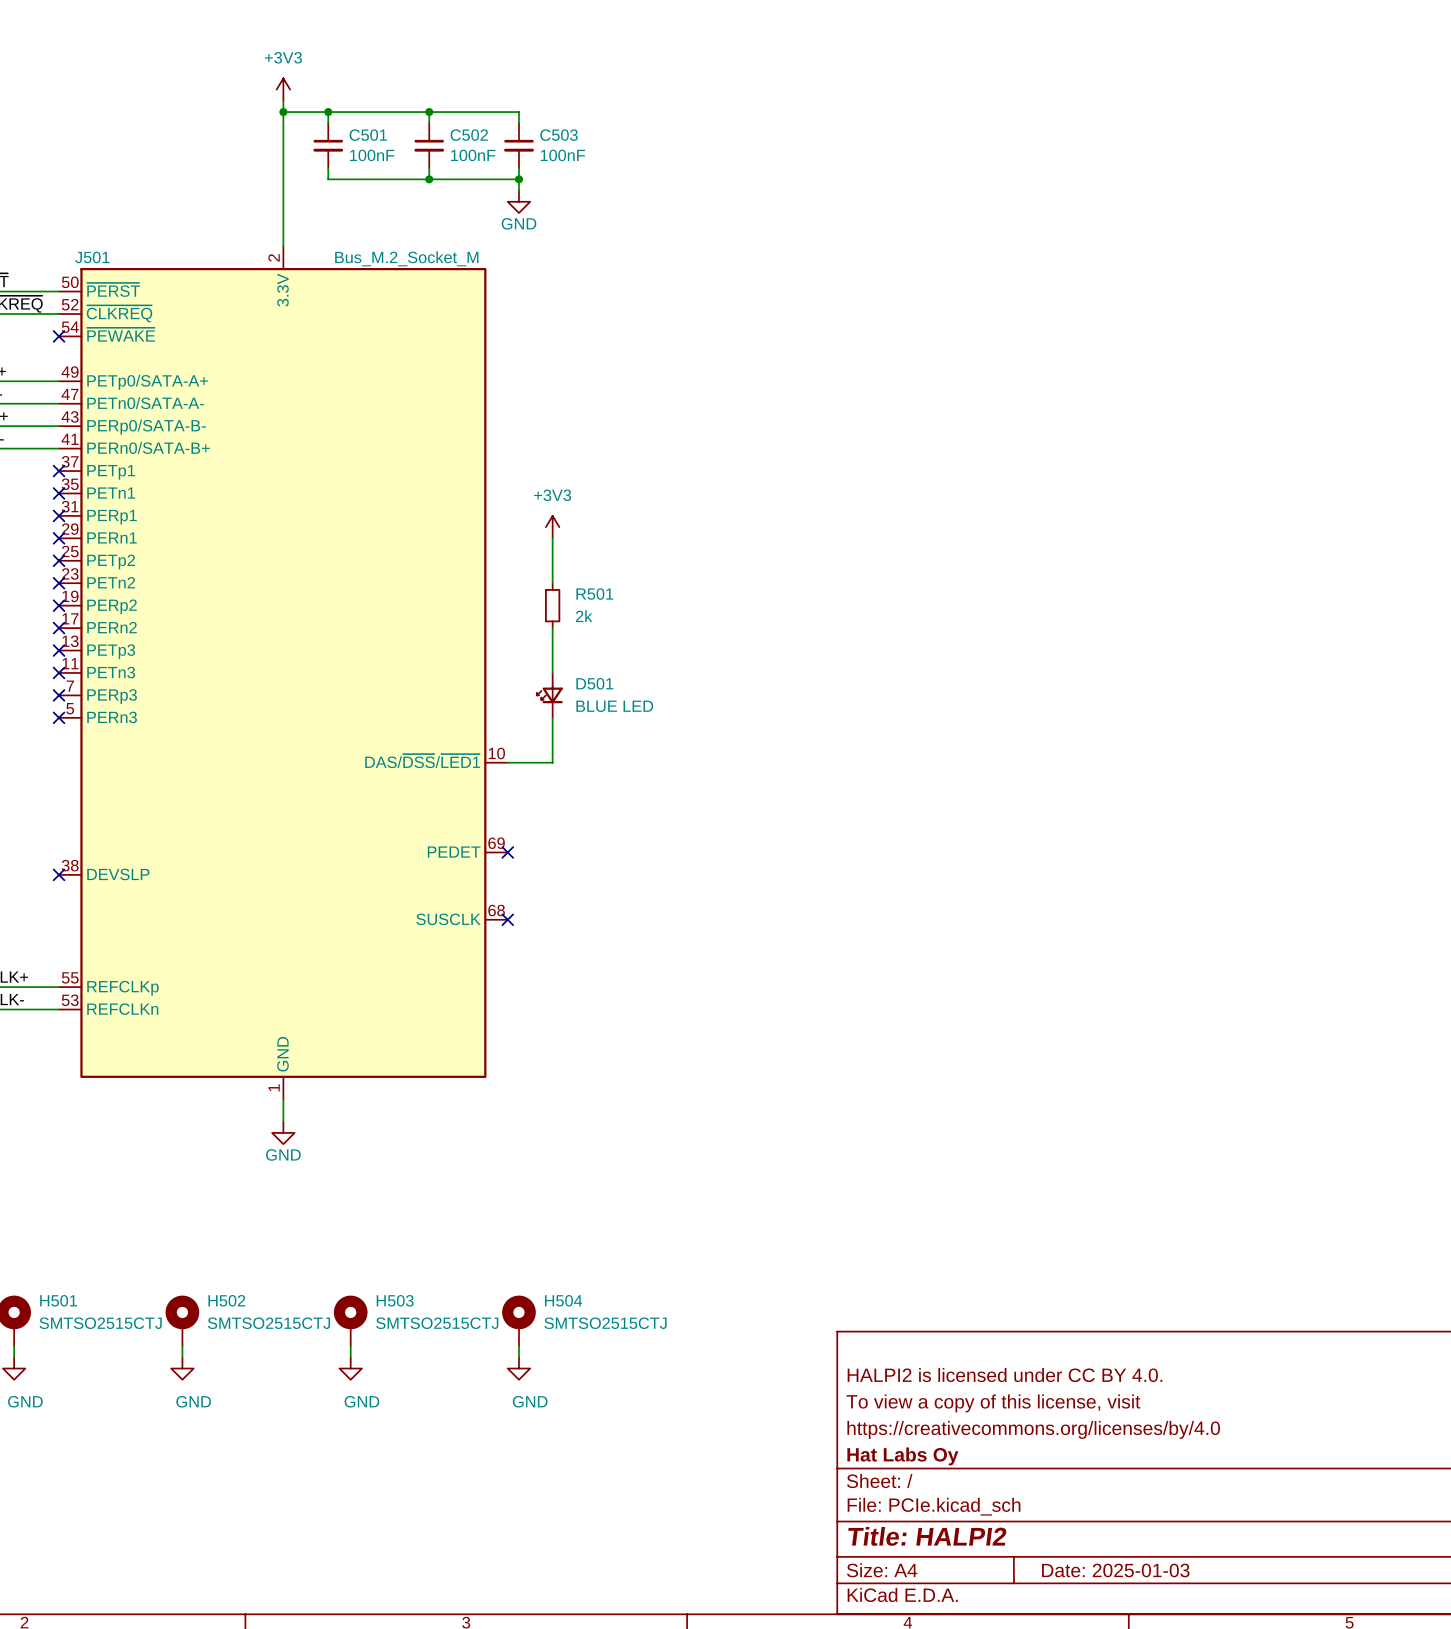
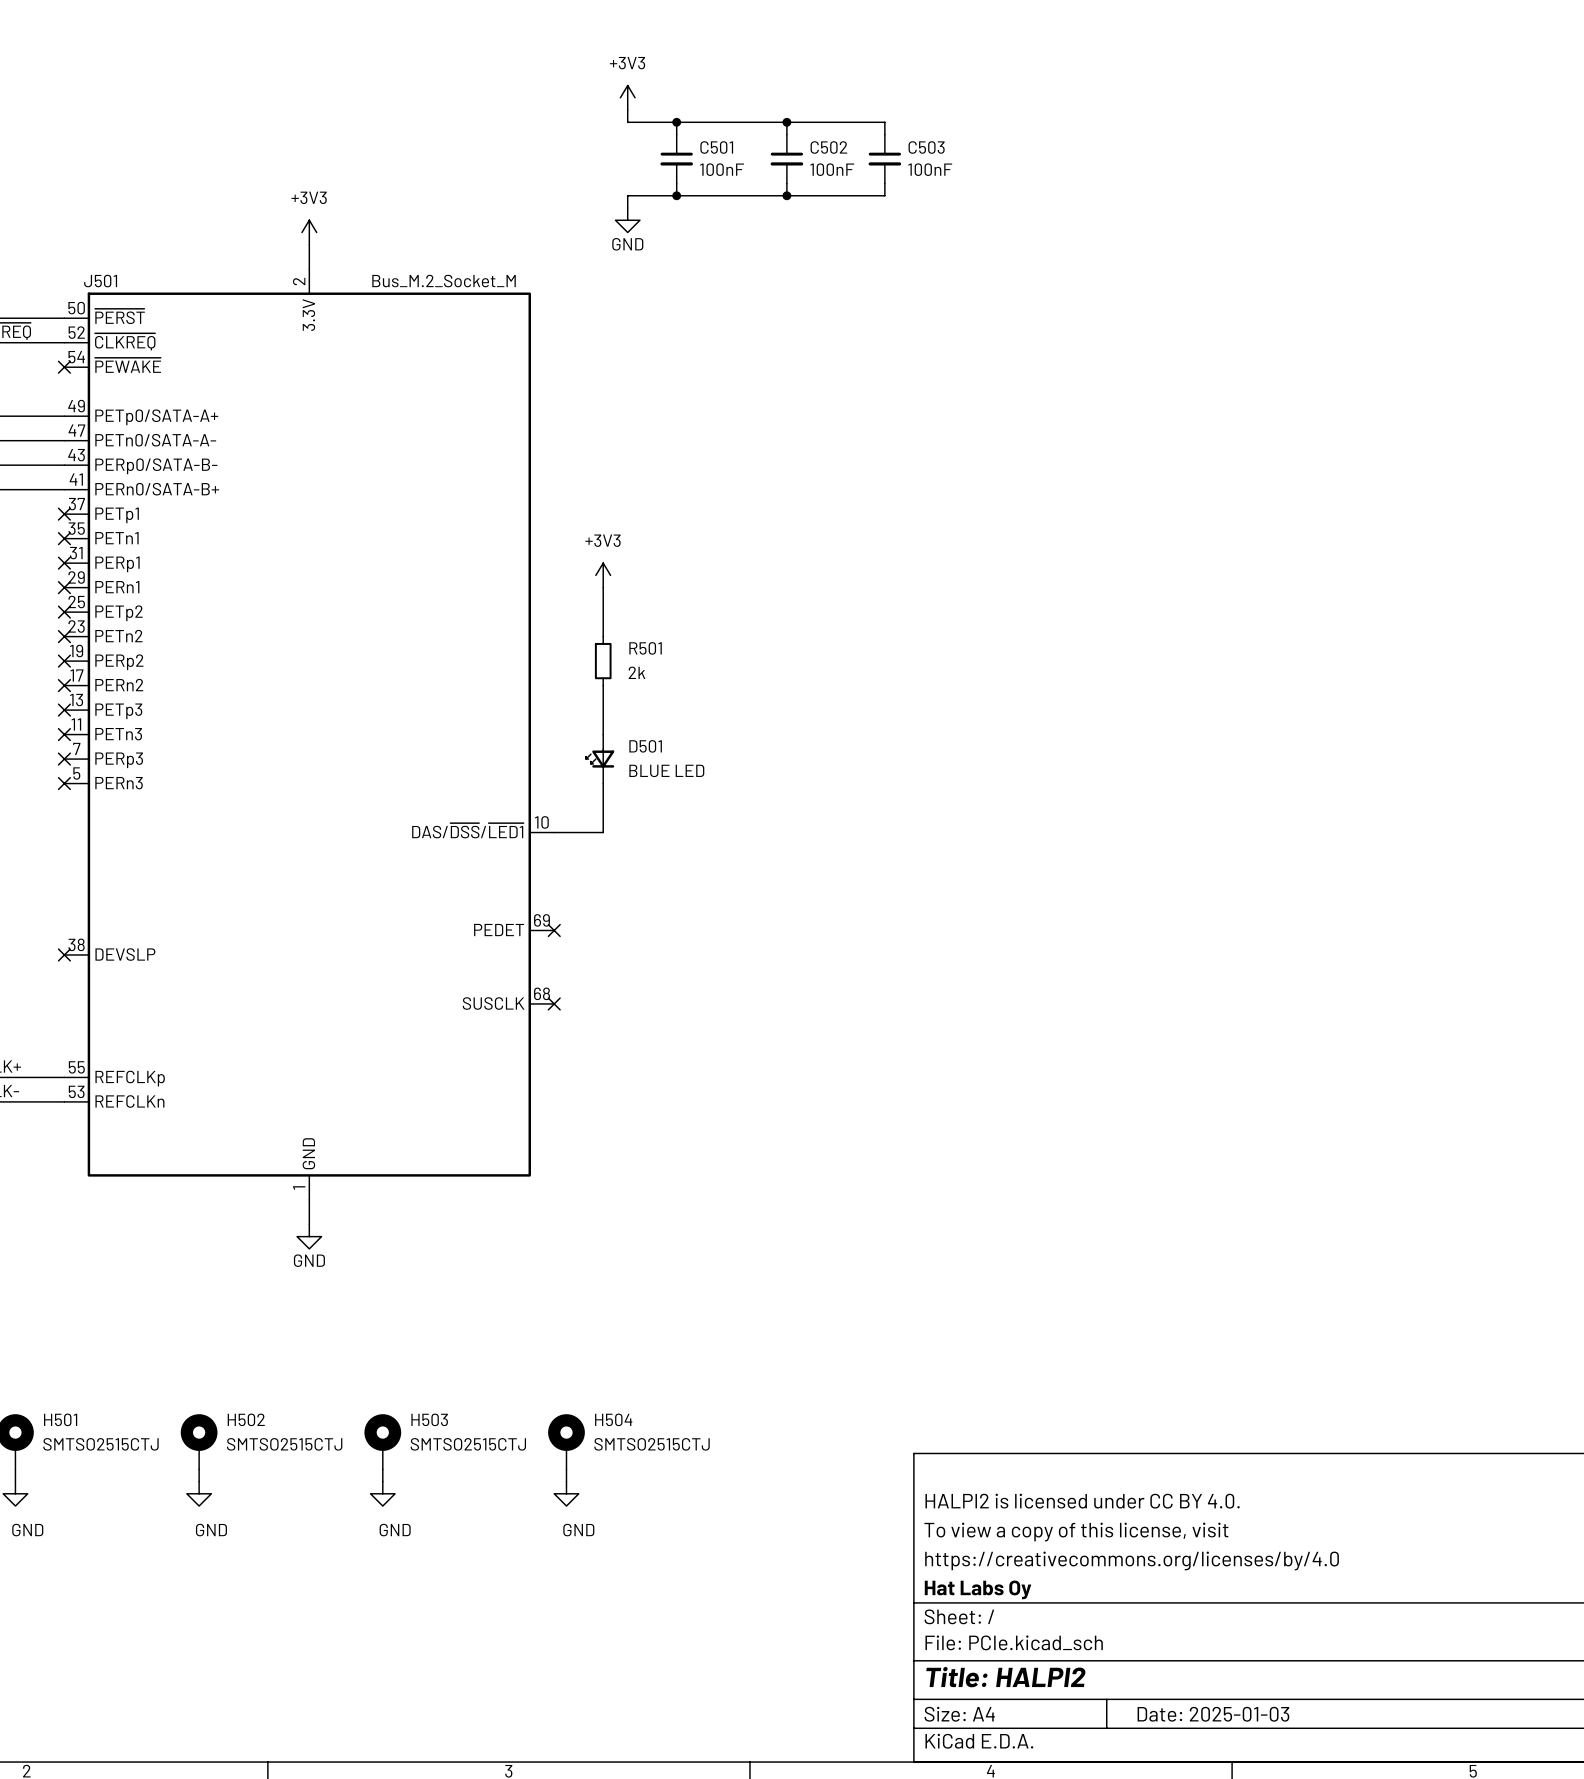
power symbol position: +3V3 (283, 89) -> +3V3 (309, 232)
power symbol: none -> +3V3 (627, 97)
wire: (283, 100) (283, 224) -> none
wire: none -> (627, 110) (627, 122) (884, 122) (884, 134)
wire: (283, 112) (518, 112) (518, 123) -> none
junction: (283, 112) -> none
wire: (328, 112) (328, 123) -> none
junction: (328, 112) -> none
wire: (429, 112) (429, 123) -> (676, 122) (676, 134)
junction: (429, 112) -> none
junction: none -> (676, 122)
wire: none -> (786, 122) (786, 134)
junction: none -> (786, 122)
C501 position: (328, 145) -> (676, 159)
C502 position: (429, 145) -> (786, 159)
C503 position: (518, 145) -> (884, 159)
wire: (328, 168) (328, 179) (518, 179) -> none
wire: (429, 168) (429, 179) -> (676, 183) (676, 195)
wire: (518, 168) (518, 190) -> none
wire: none -> (786, 183) (786, 195)
wire: none -> (884, 183) (884, 195) (627, 195) (627, 208)
junction: (429, 179) -> none
junction: (518, 179) -> none
junction: none -> (676, 195)
junction: none -> (786, 195)
power symbol position: GND (518, 201) -> GND (627, 220)

